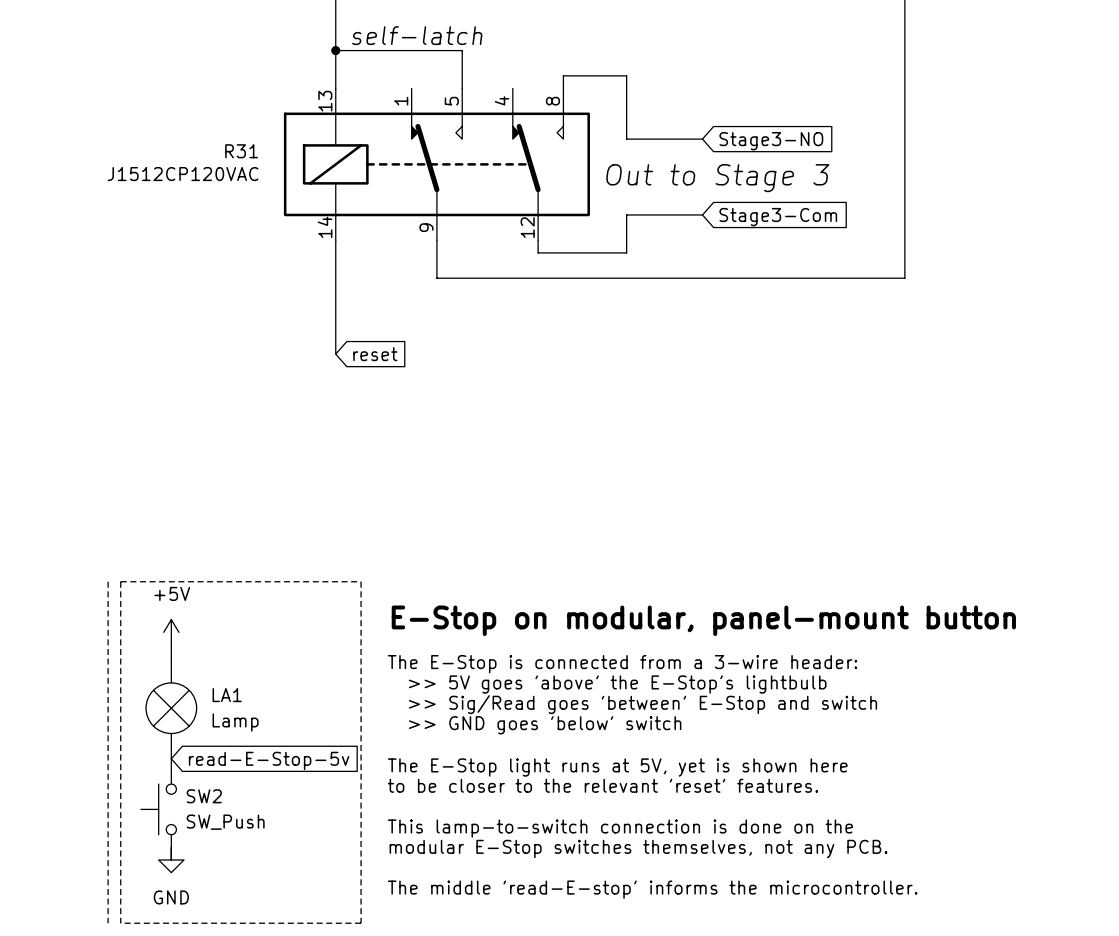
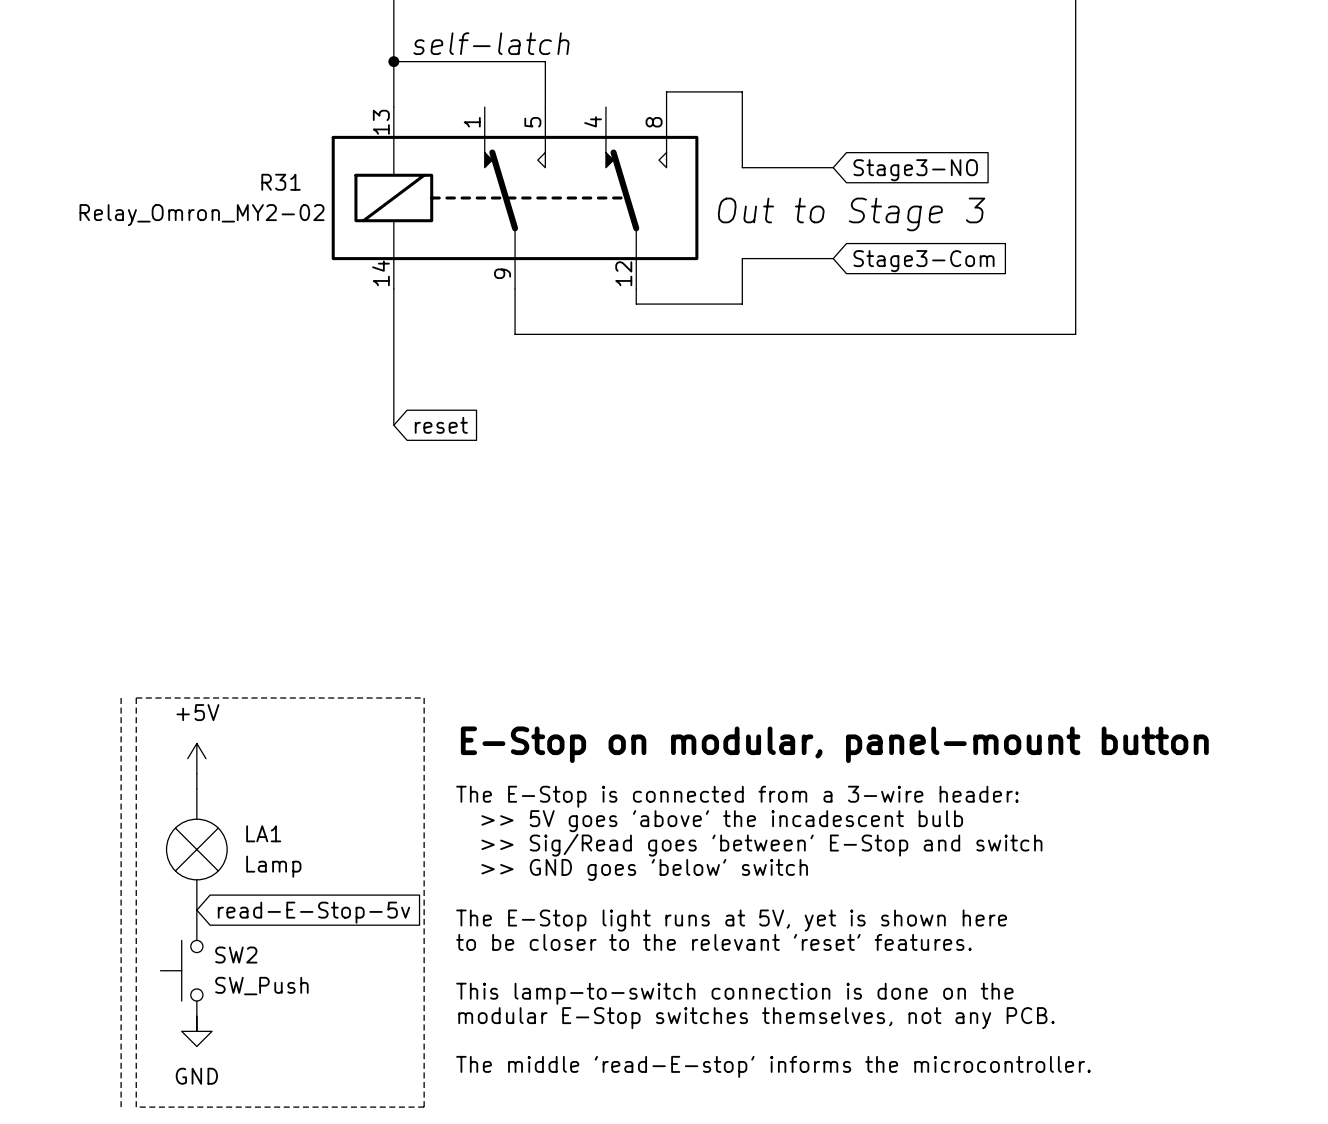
R31 value: J1512CP120VAC (183, 174) -> Relay_Omron_MY2-02 (202, 215)
text: >> 5V goes 'above' the E-Stop's lightbulb (617, 684) -> >> 5V goes 'above' the incadescent bulb (722, 821)

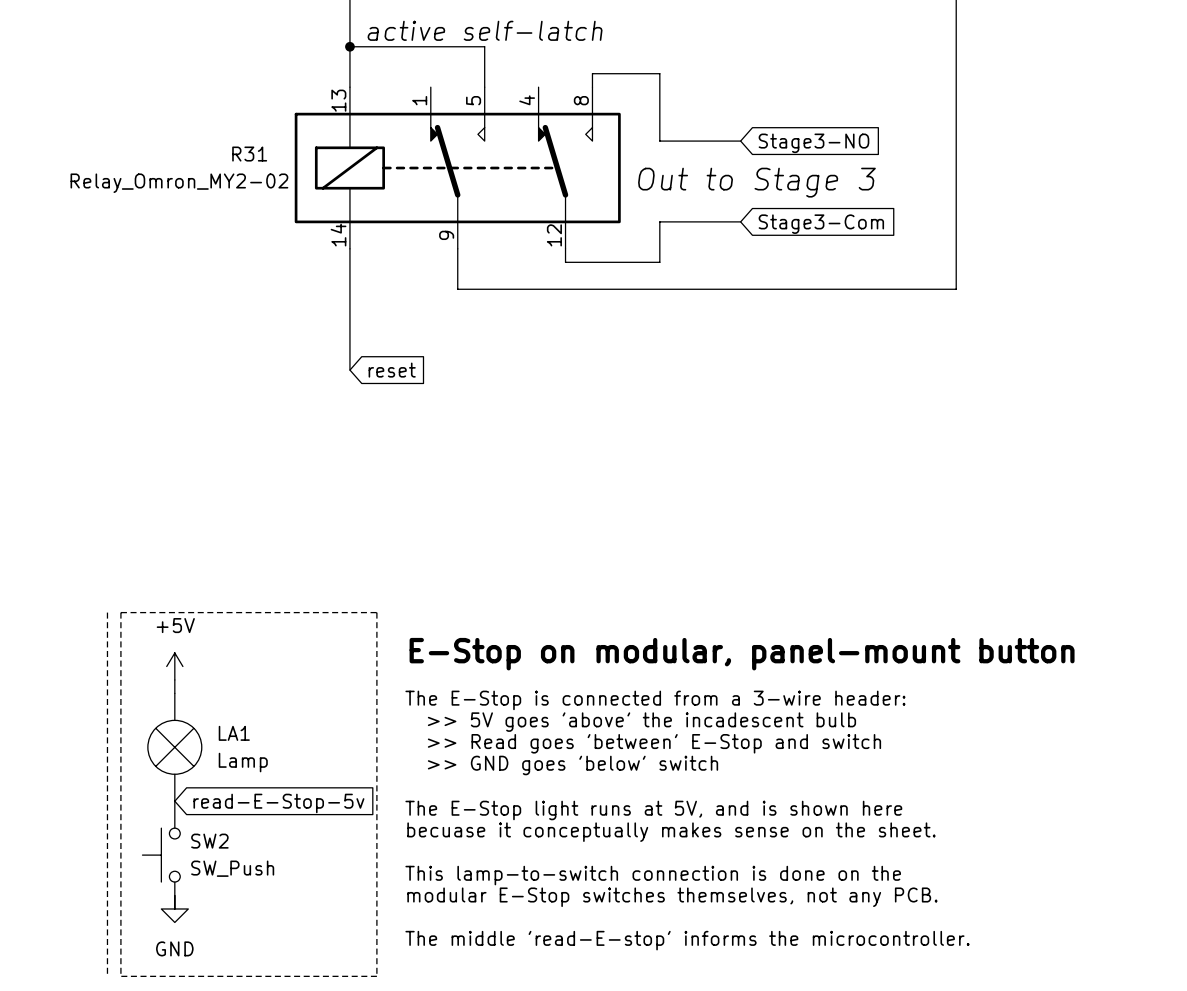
label: self-latch (491, 43) -> active self-latch (485, 30)
text: >> Sig/Read goes 'between' E-Stop and switch (761, 845) -> >> Read goes 'between' E-Stop and switch (654, 743)
text: The E-Stop light runs at 5V, yet is shown here (731, 920) -> The E-Stop light runs at 5V, and is shown here (653, 810)
text: to be closer to the relevant 'reset' features. (713, 942) -> becuase it conceptually makes sense on the sheet. (671, 832)

